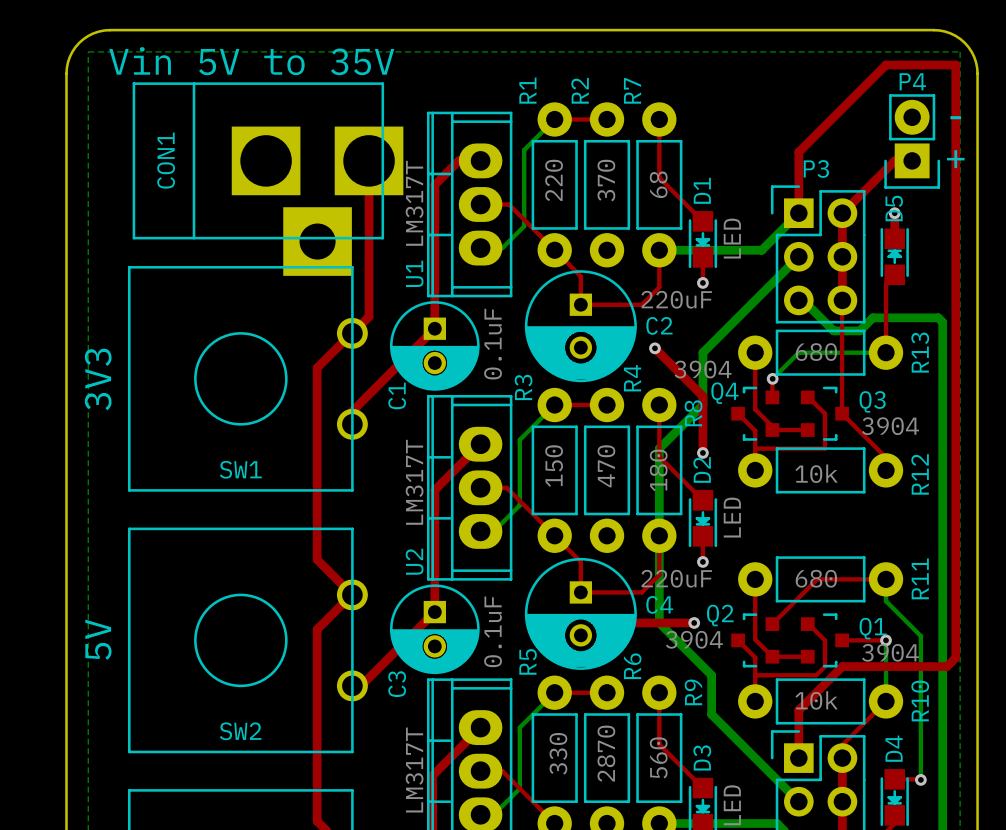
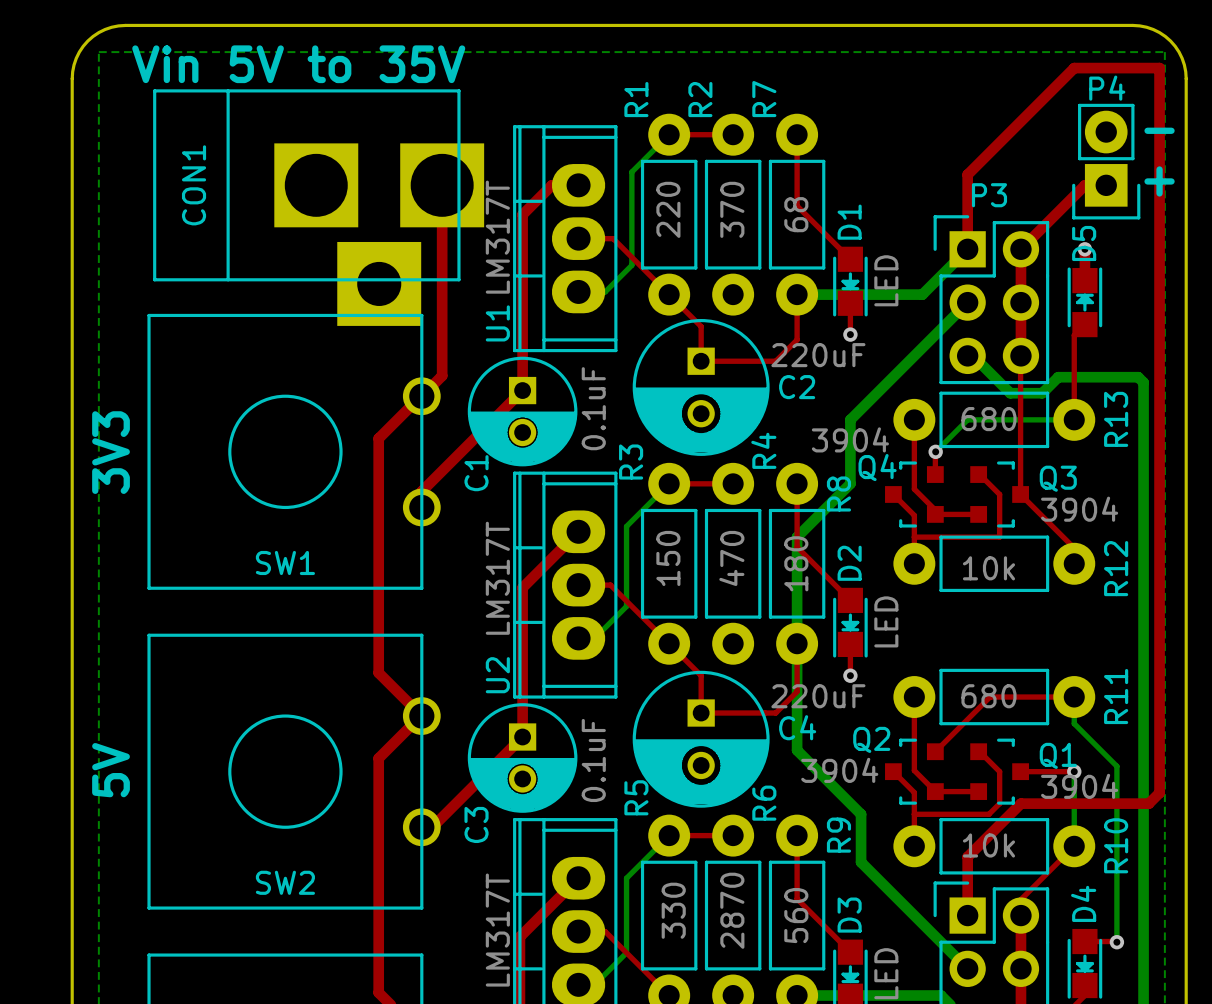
top track: (654, 348) (702, 396) (702, 452) -> none
via: (654, 348) -> none
via: (702, 452) -> none
top track: (620, 622) (694, 622) -> none
via: (694, 622) -> none

